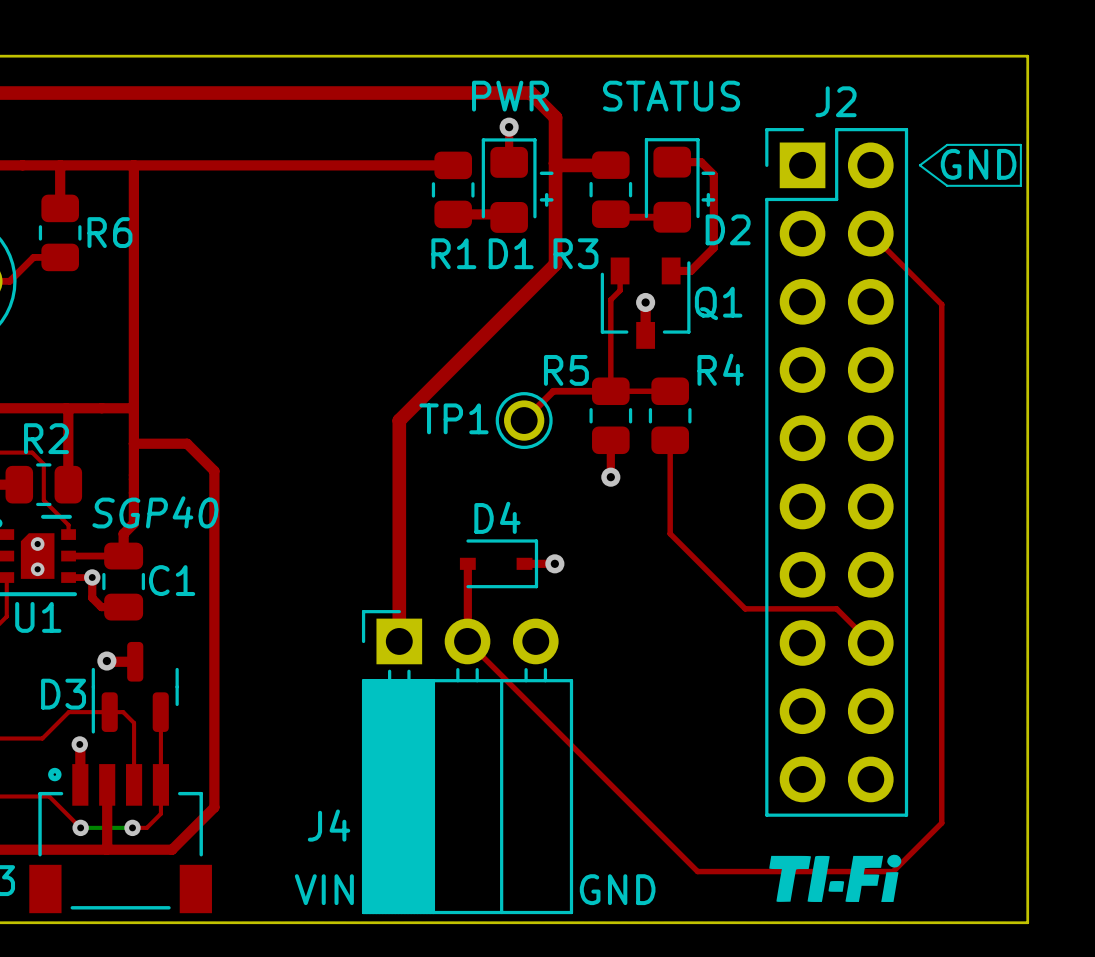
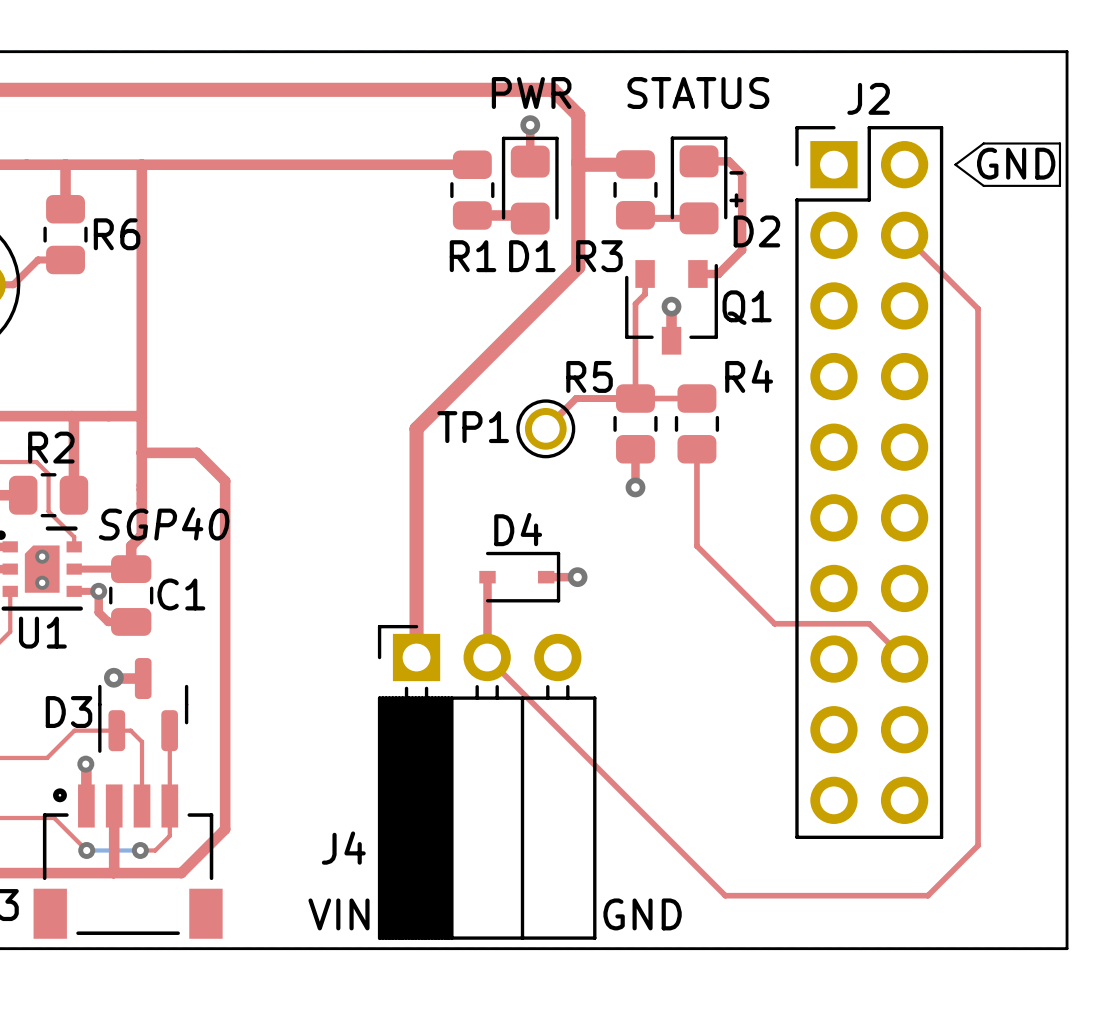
text: - (546, 173) -> none
text: + (546, 199) -> none
drawing: [769, 854, 902, 902] -> none

